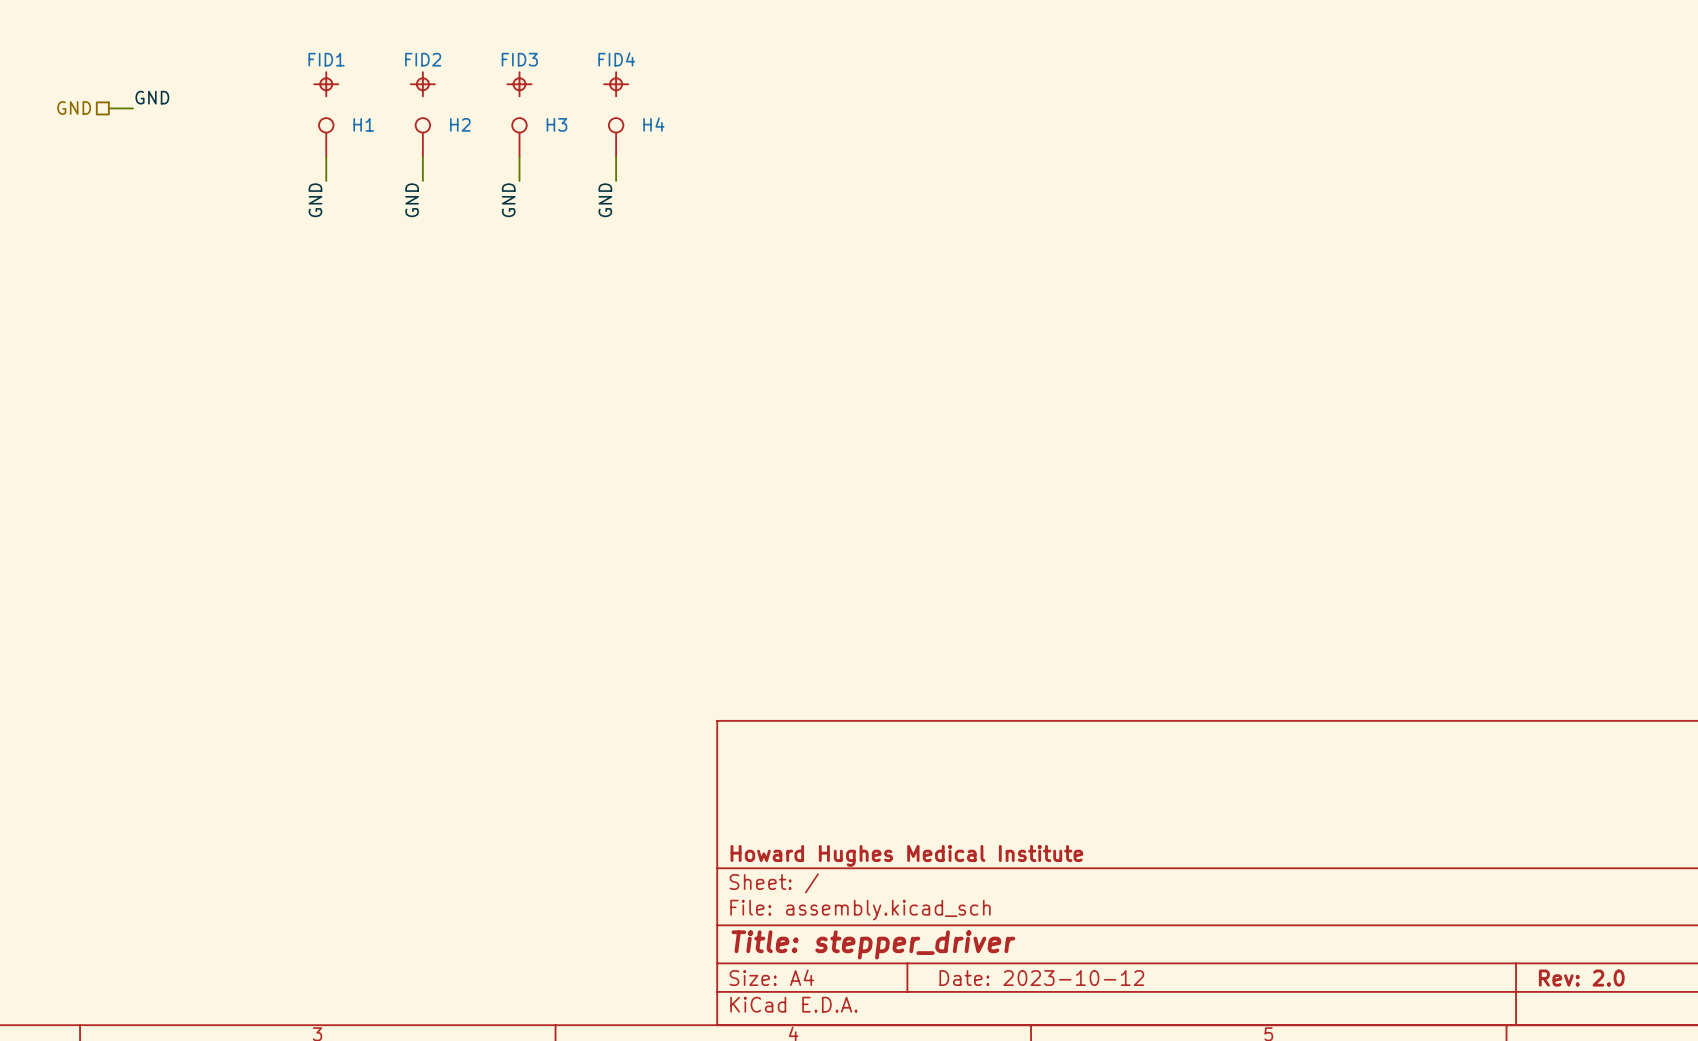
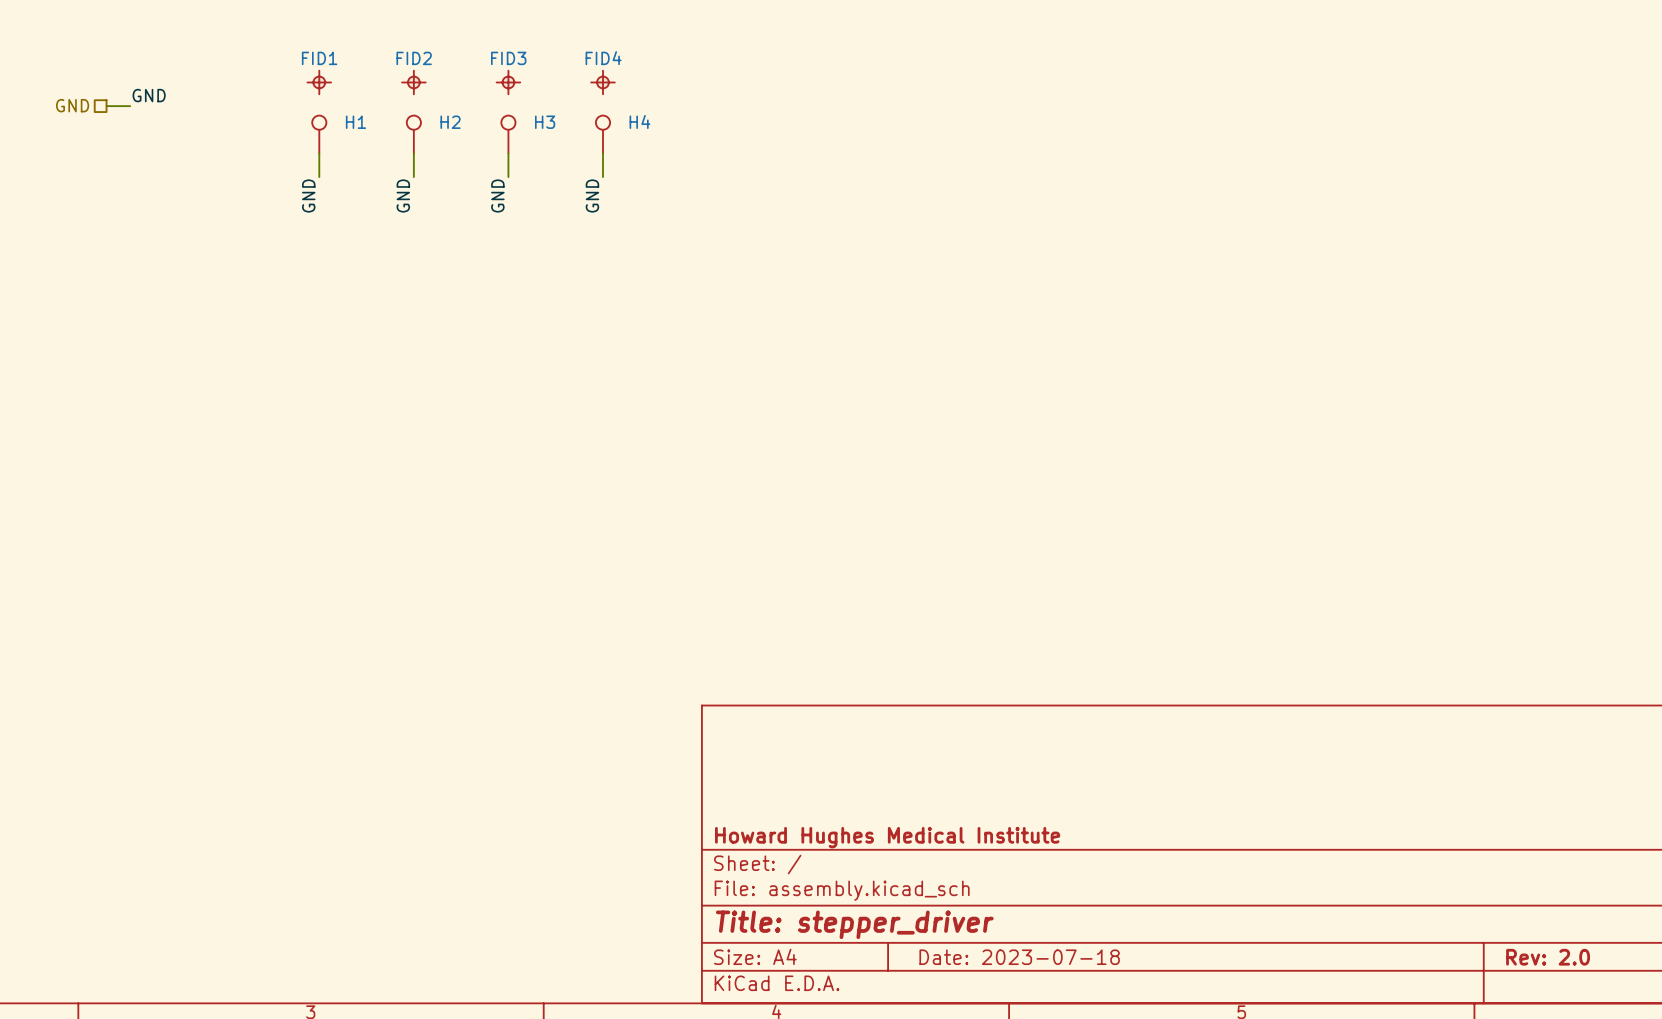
title block: Date: 2023-10-12 (1041, 978) -> Date: 2023-07-18 (1019, 957)

